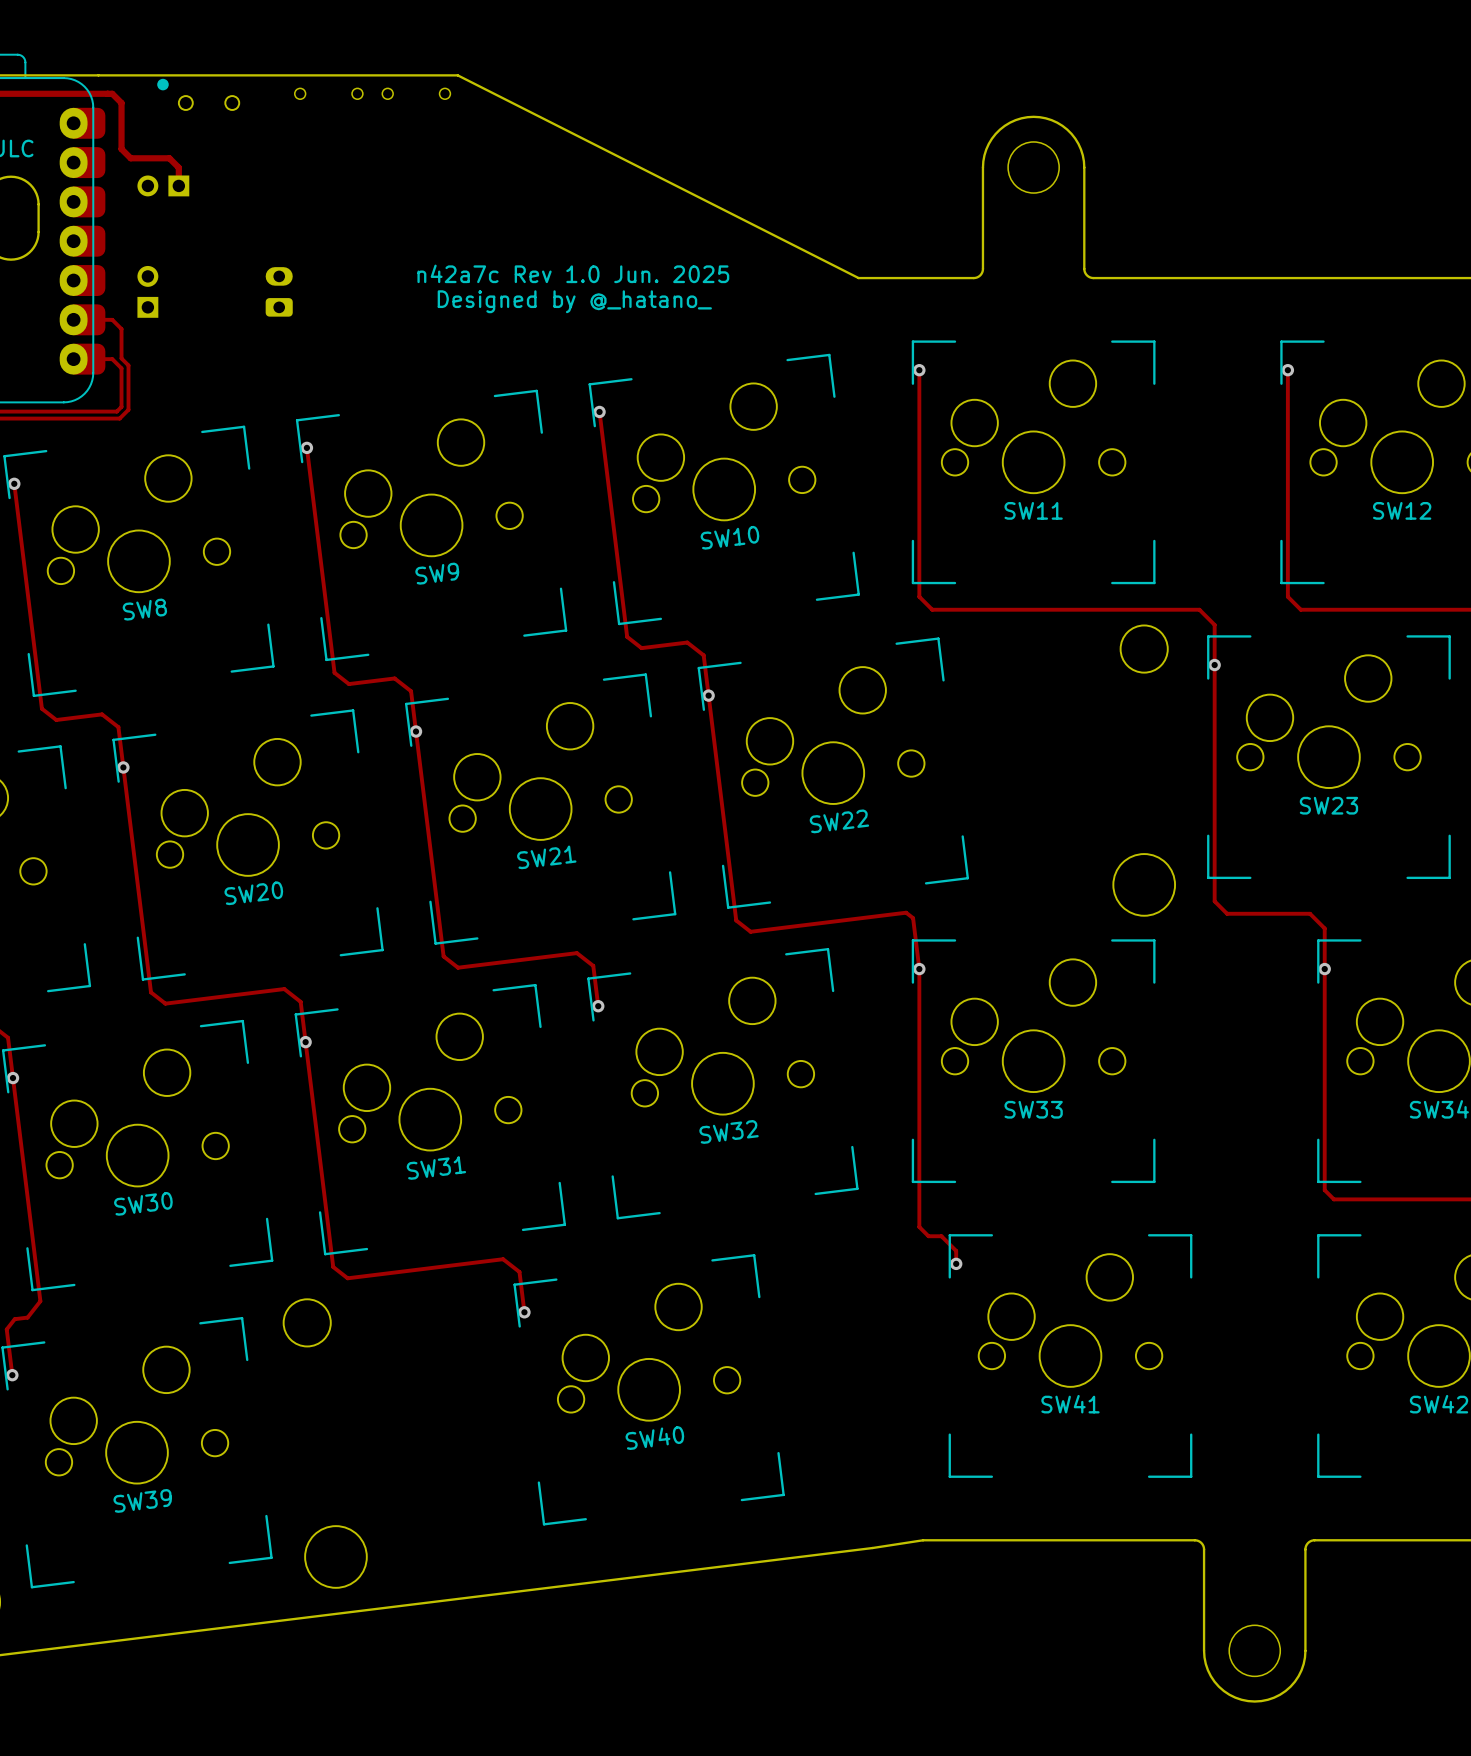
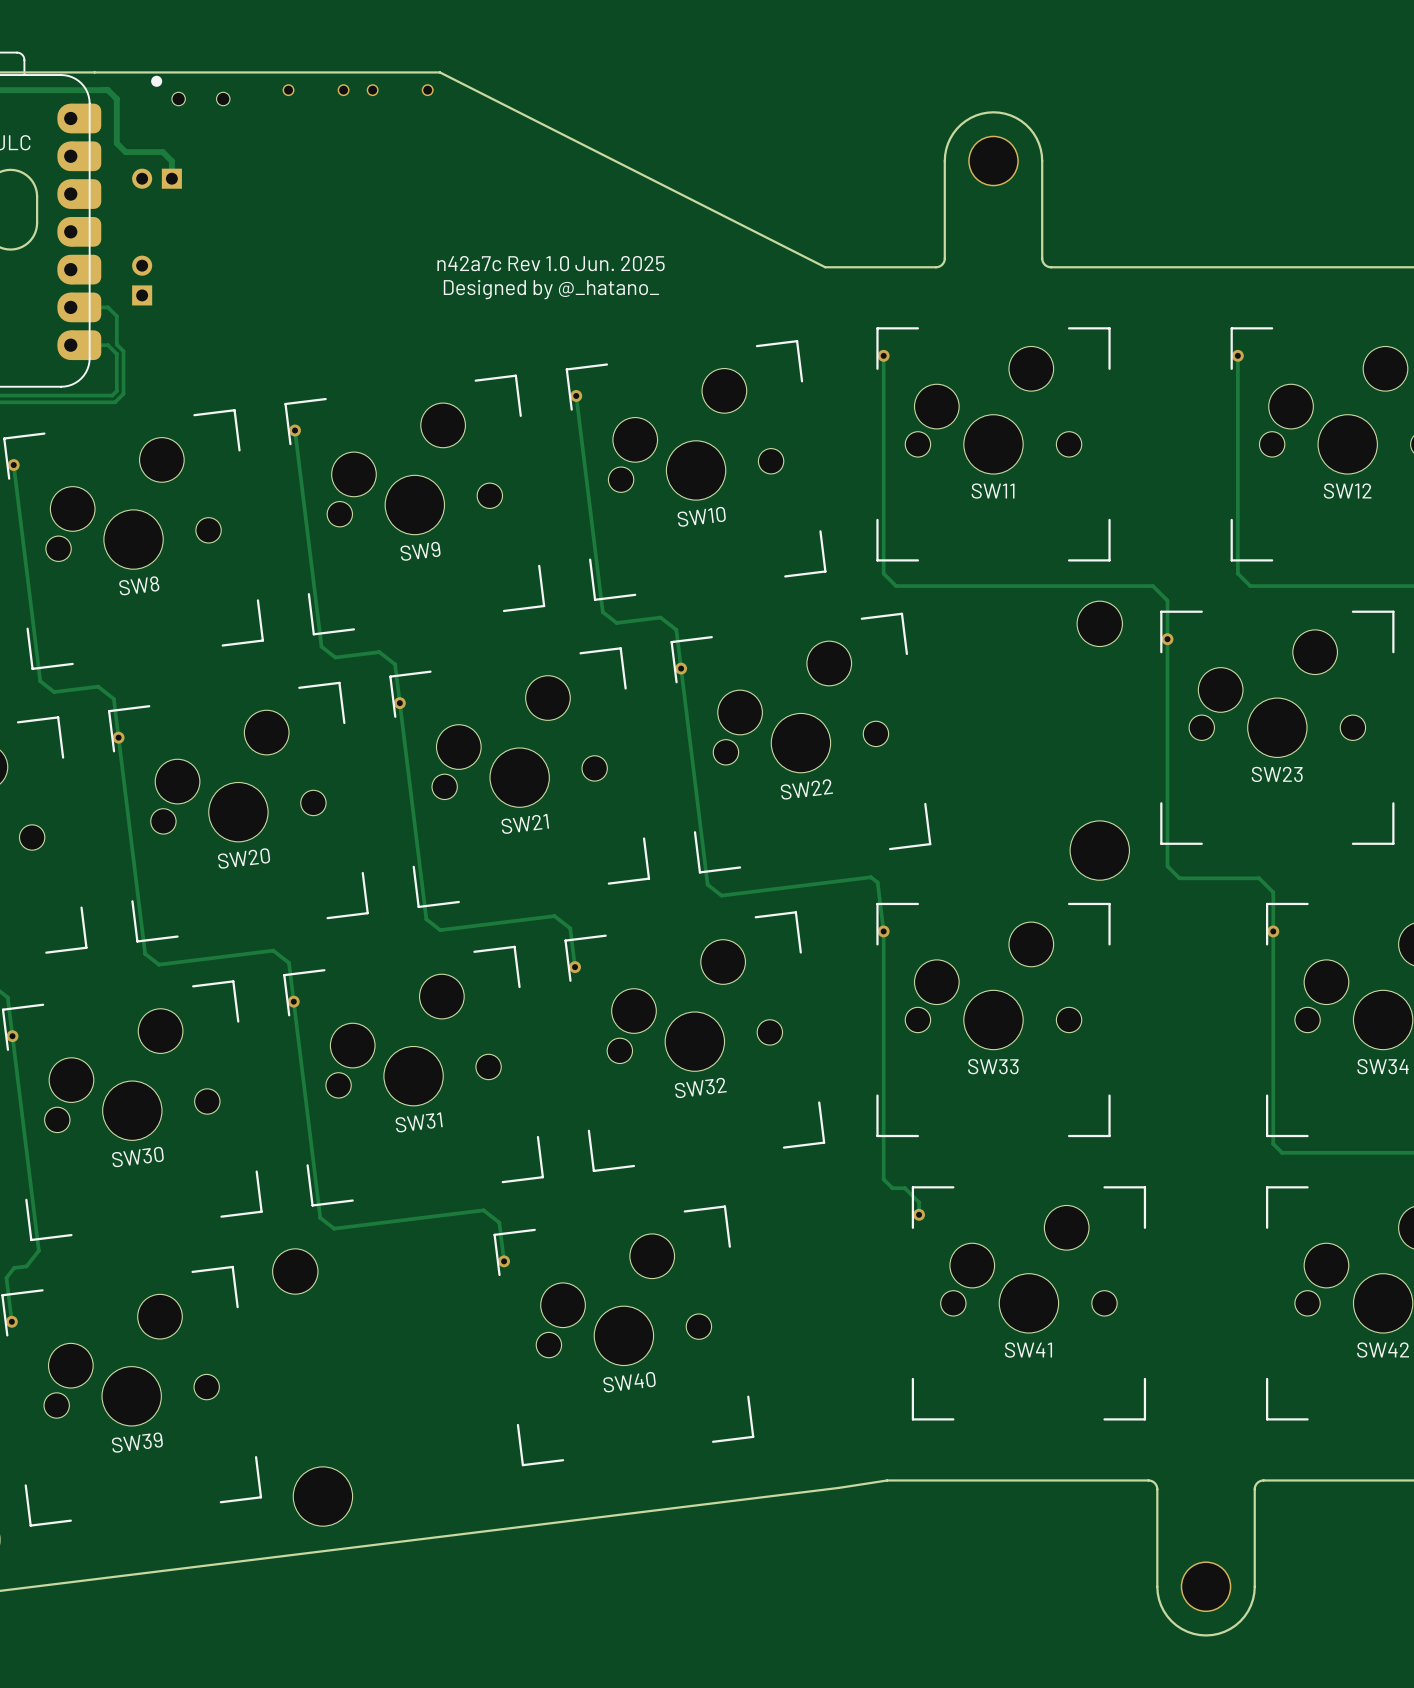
part: (279, 291) -> none

